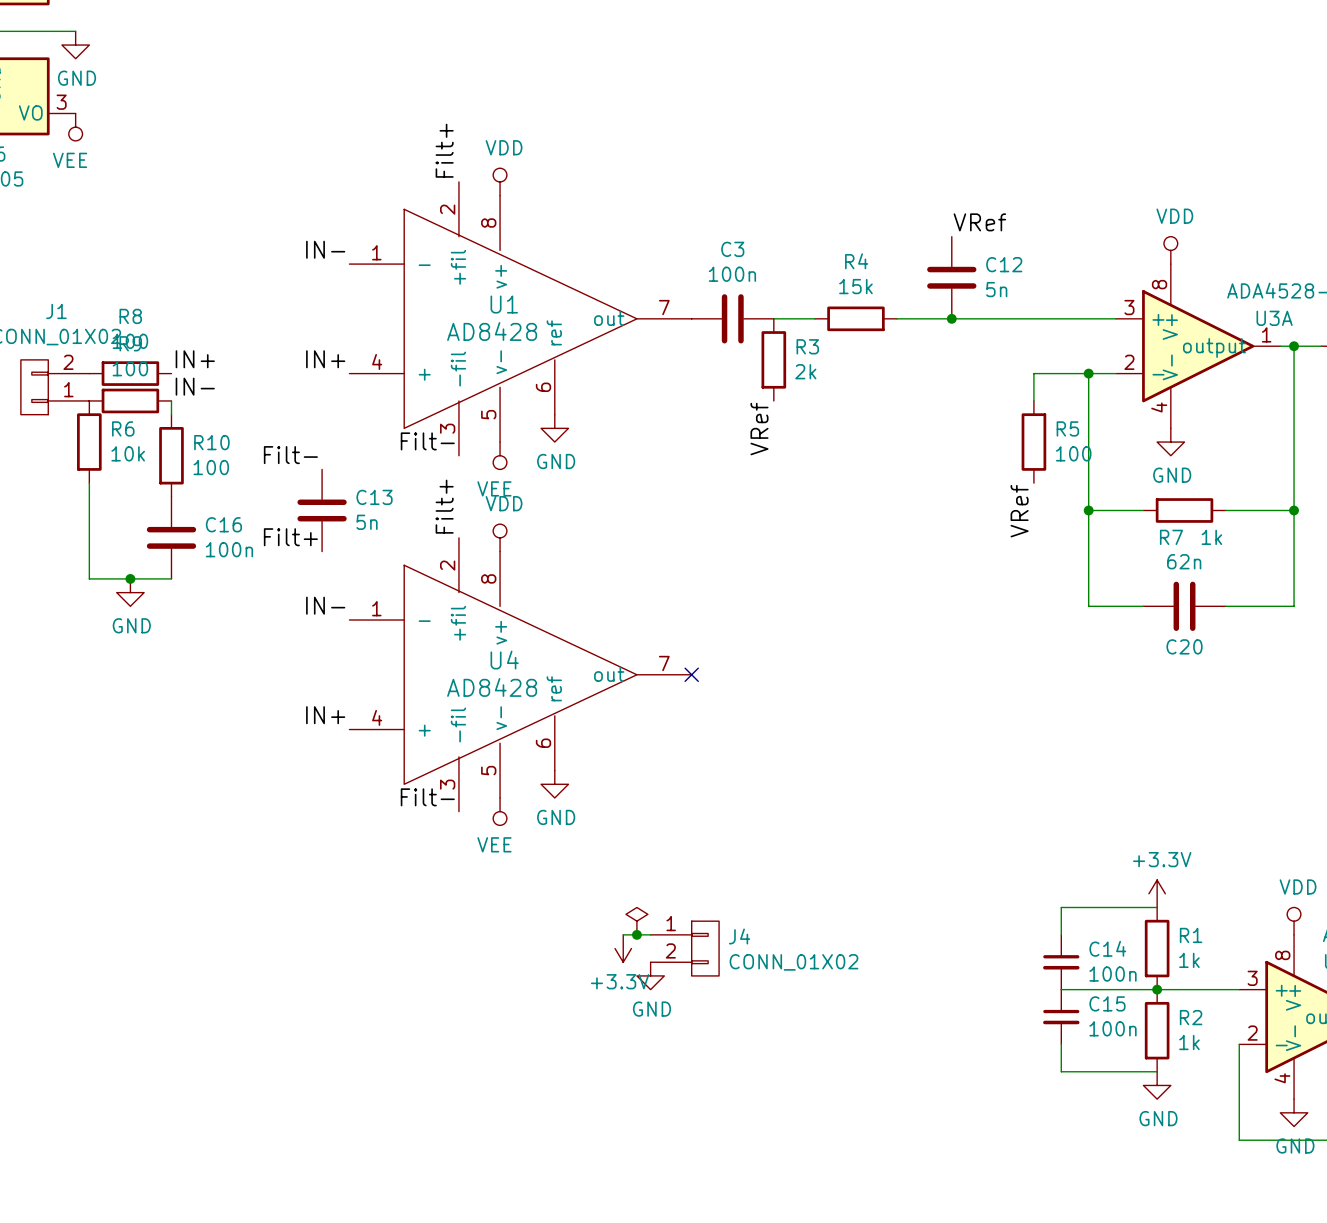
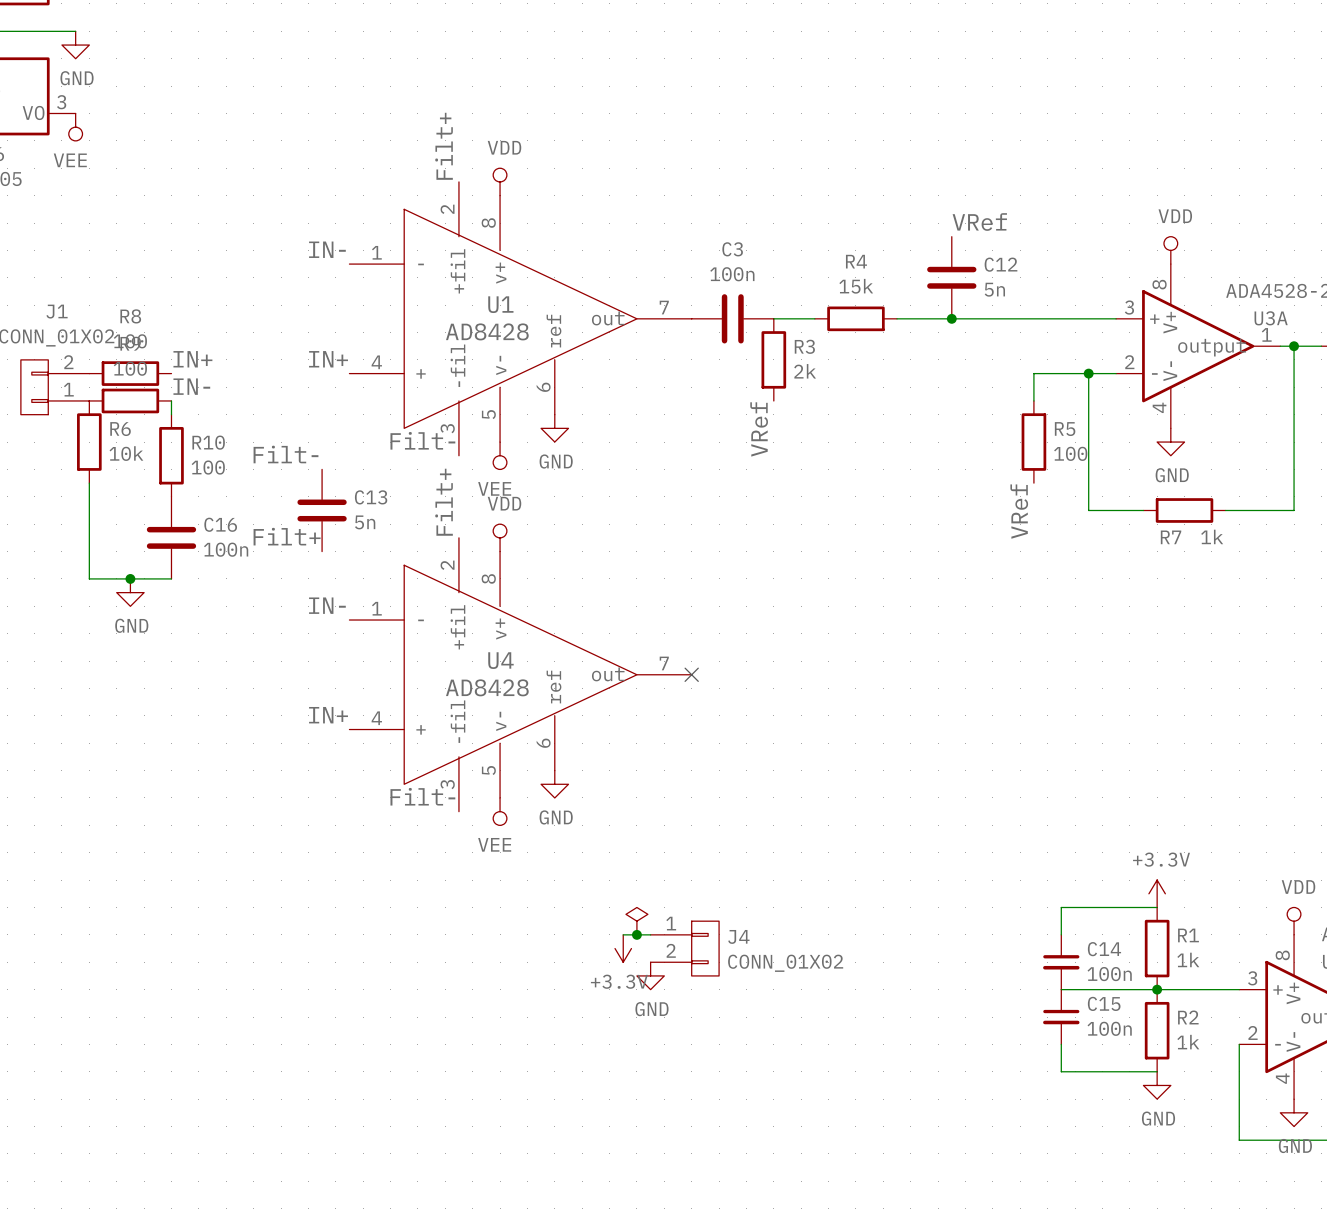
wire: (1088, 510) (1088, 606) (1143, 606) -> none
junction: (1088, 510) -> none
wire: (1294, 510) (1294, 606) (1225, 606) -> none
junction: (1294, 510) -> none
C20: 62n (1184, 606) -> none

